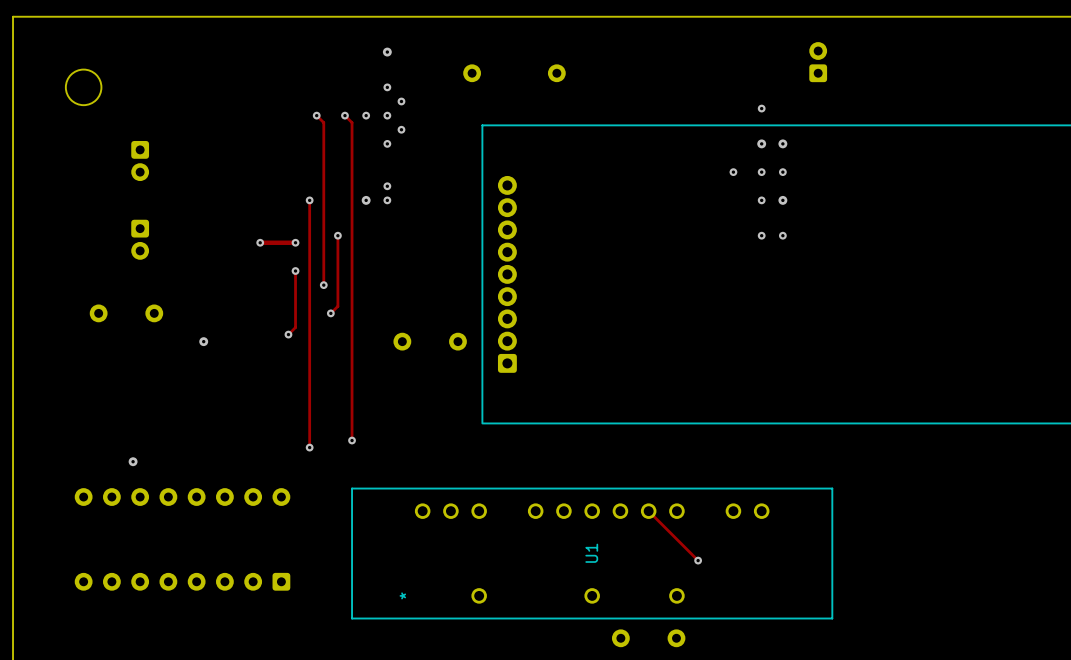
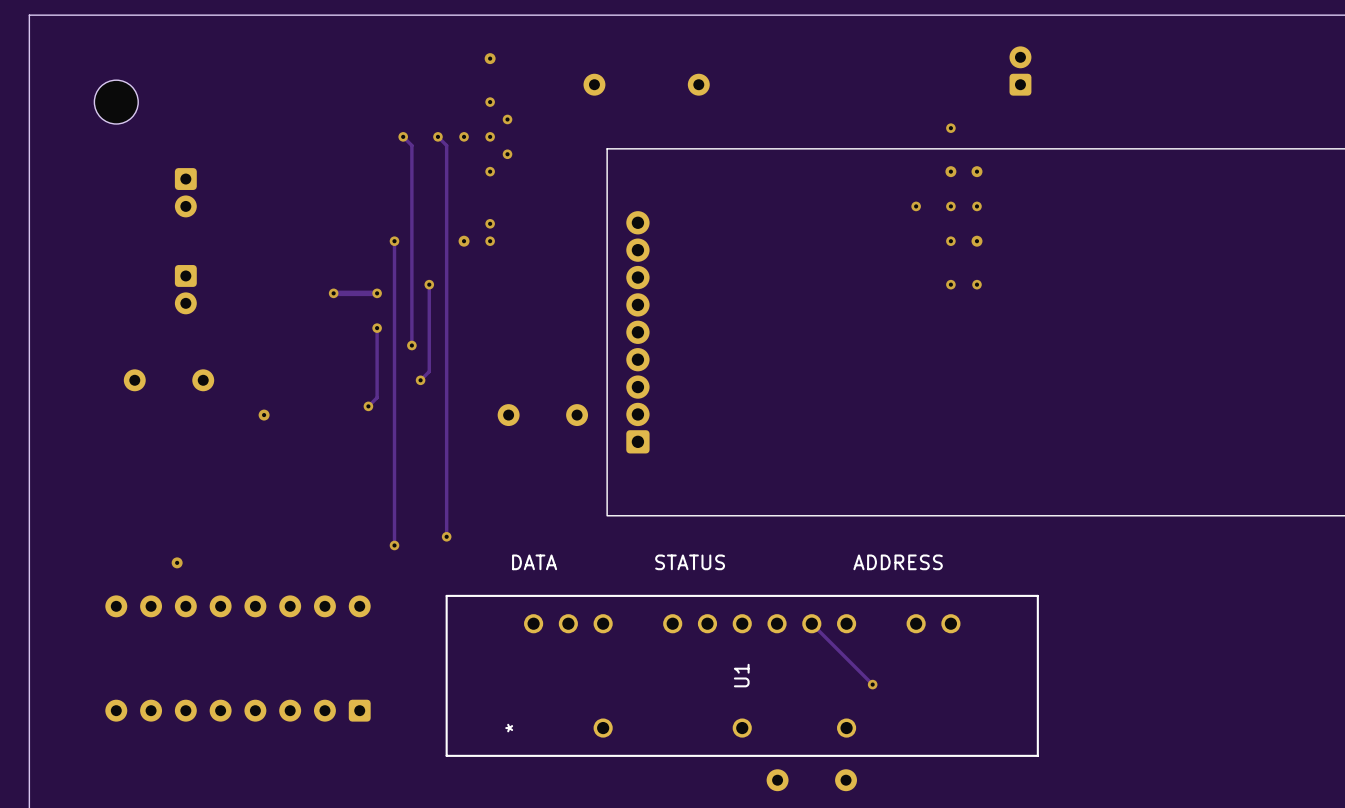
text: none -> DATA (534, 562)
text: none -> STATUS (690, 562)
text: none -> ADDRESS (898, 562)

